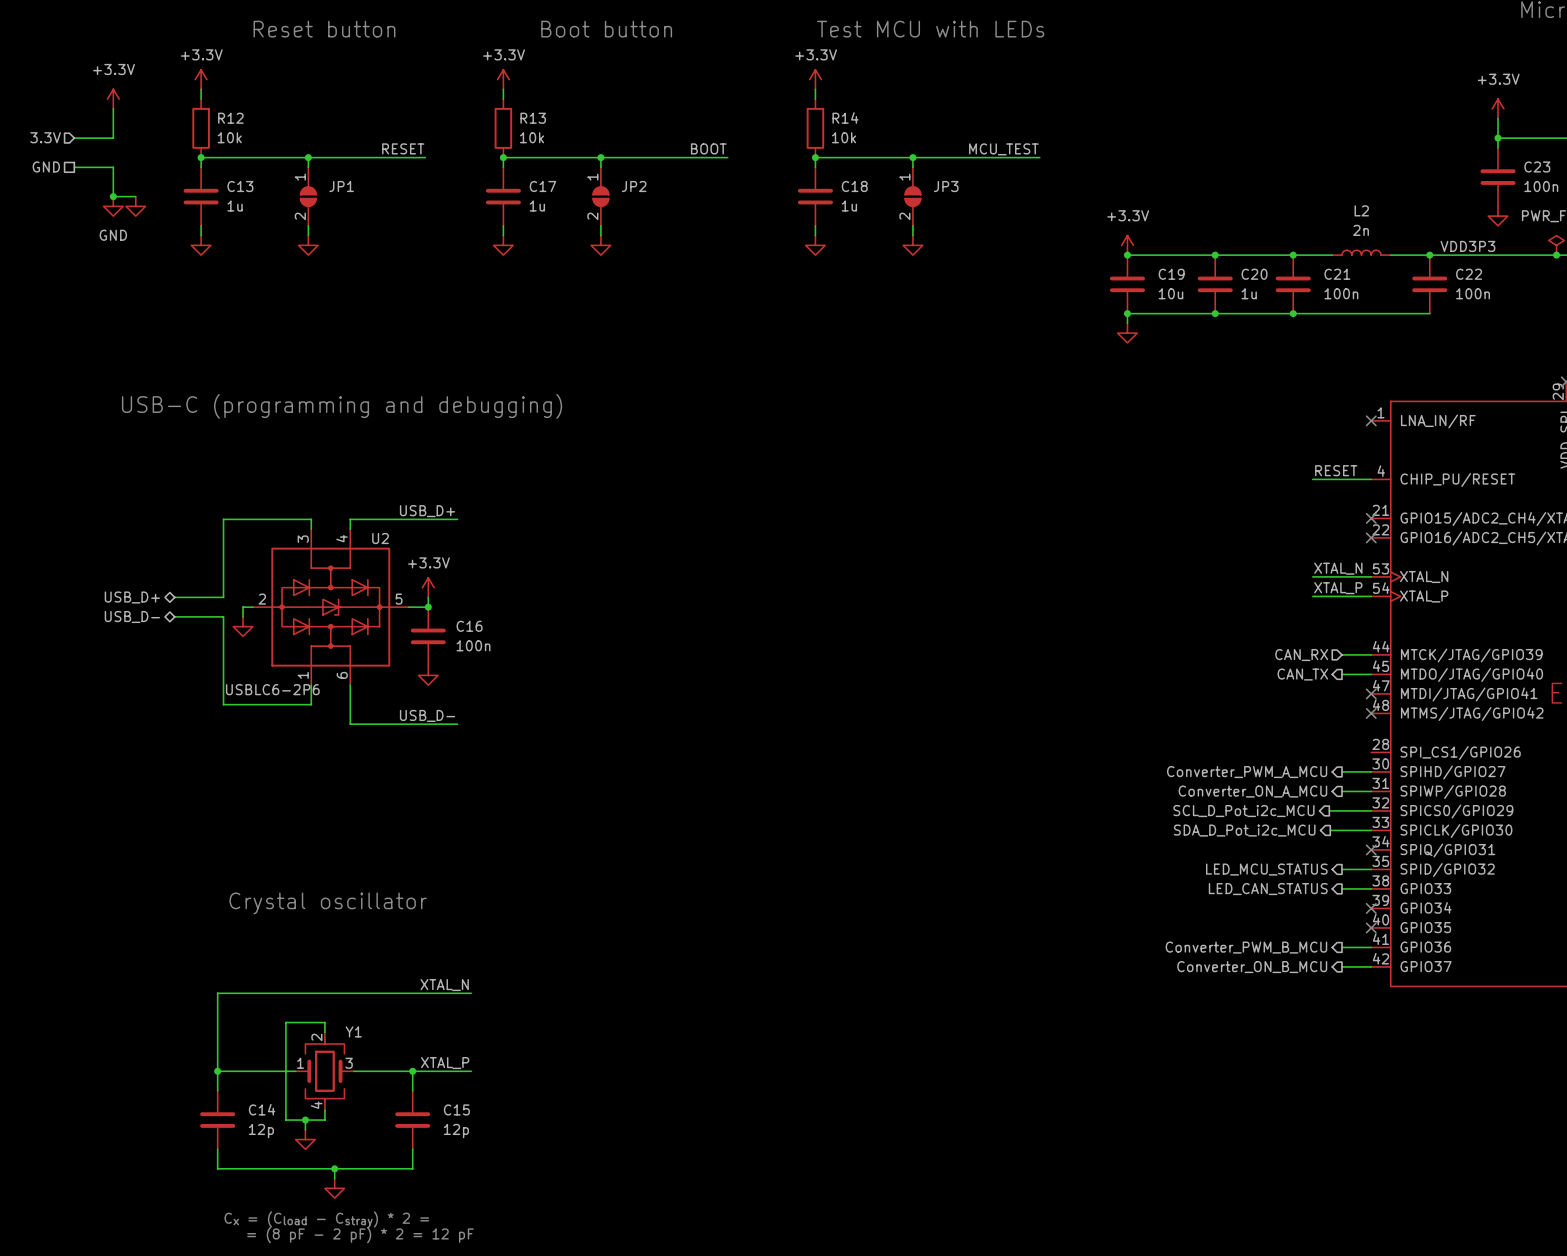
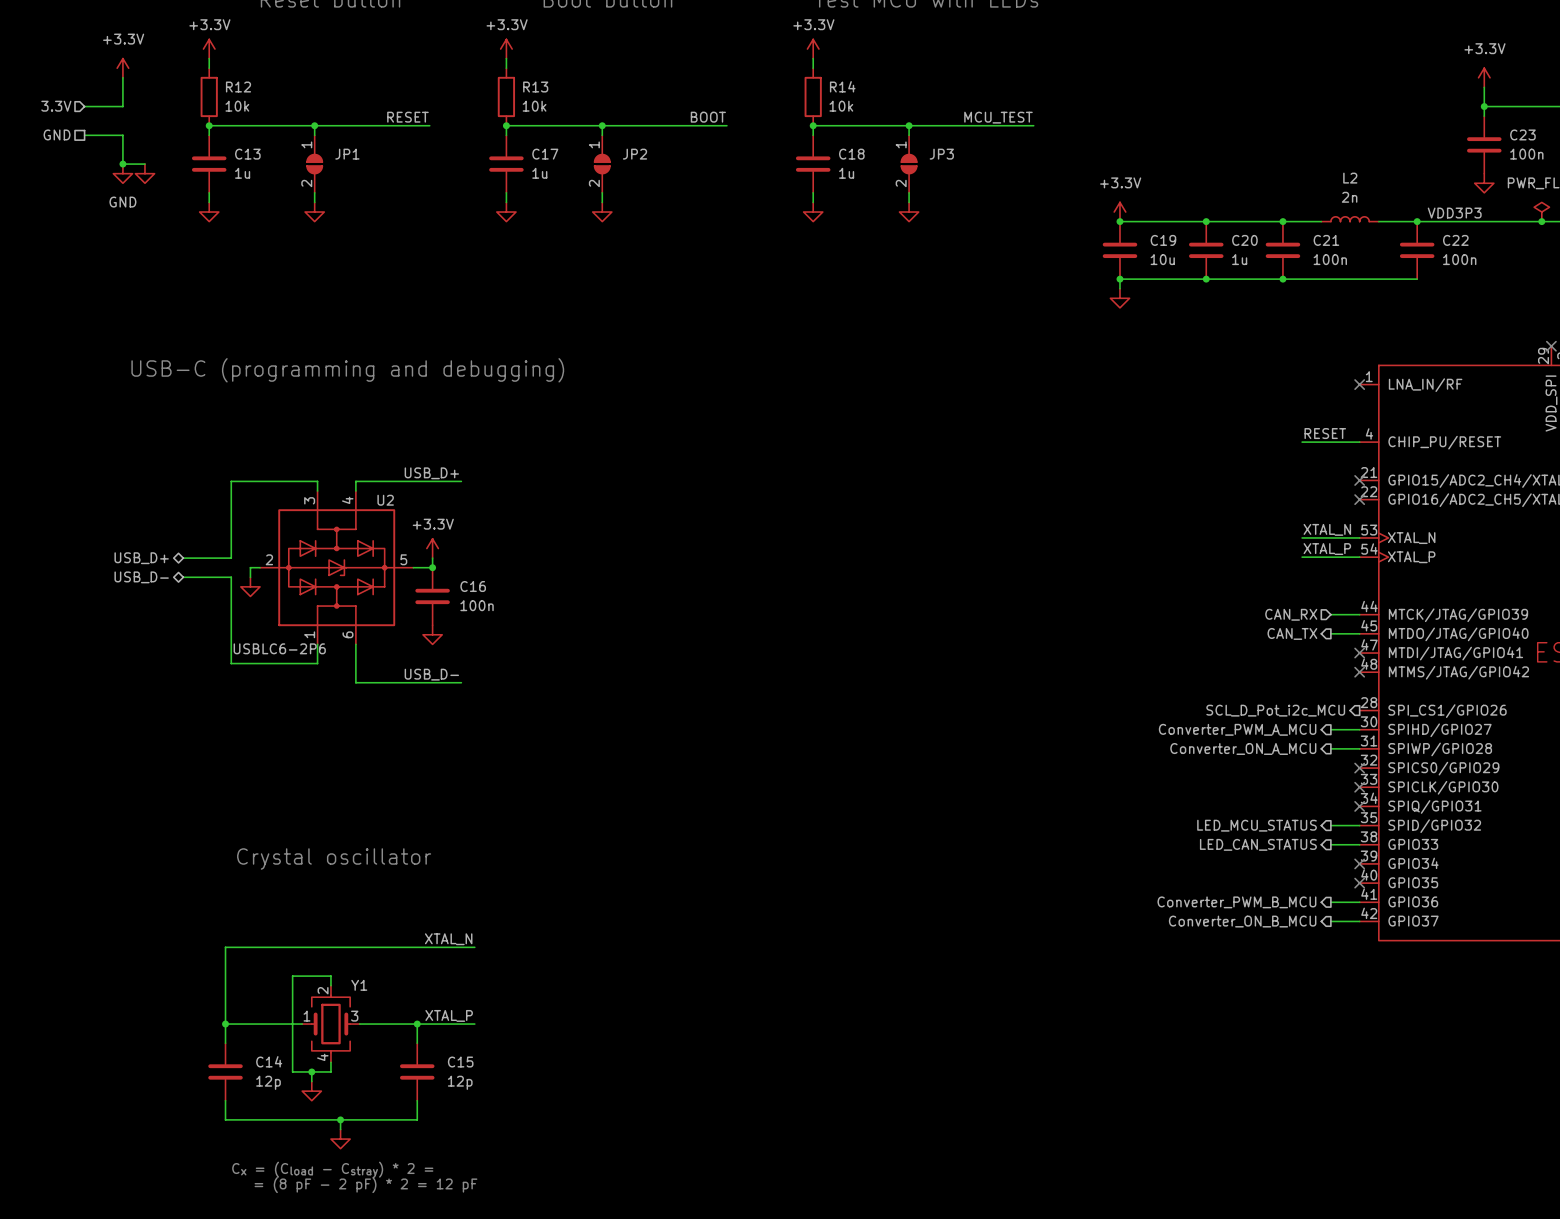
wire: (1329, 810) (1371, 810) -> none
no-connect mark: none -> (1359, 768)
hierarchical label position: SCL_D_Pot_i2c_MCU (1243, 811) -> SCL_D_Pot_i2c_MCU (1275, 710)
hierarchical label: SDA_D_Pot_i2c_MCU (1244, 830) -> none
wire: (1330, 830) (1371, 830) -> none
no-connect mark: none -> (1359, 787)

